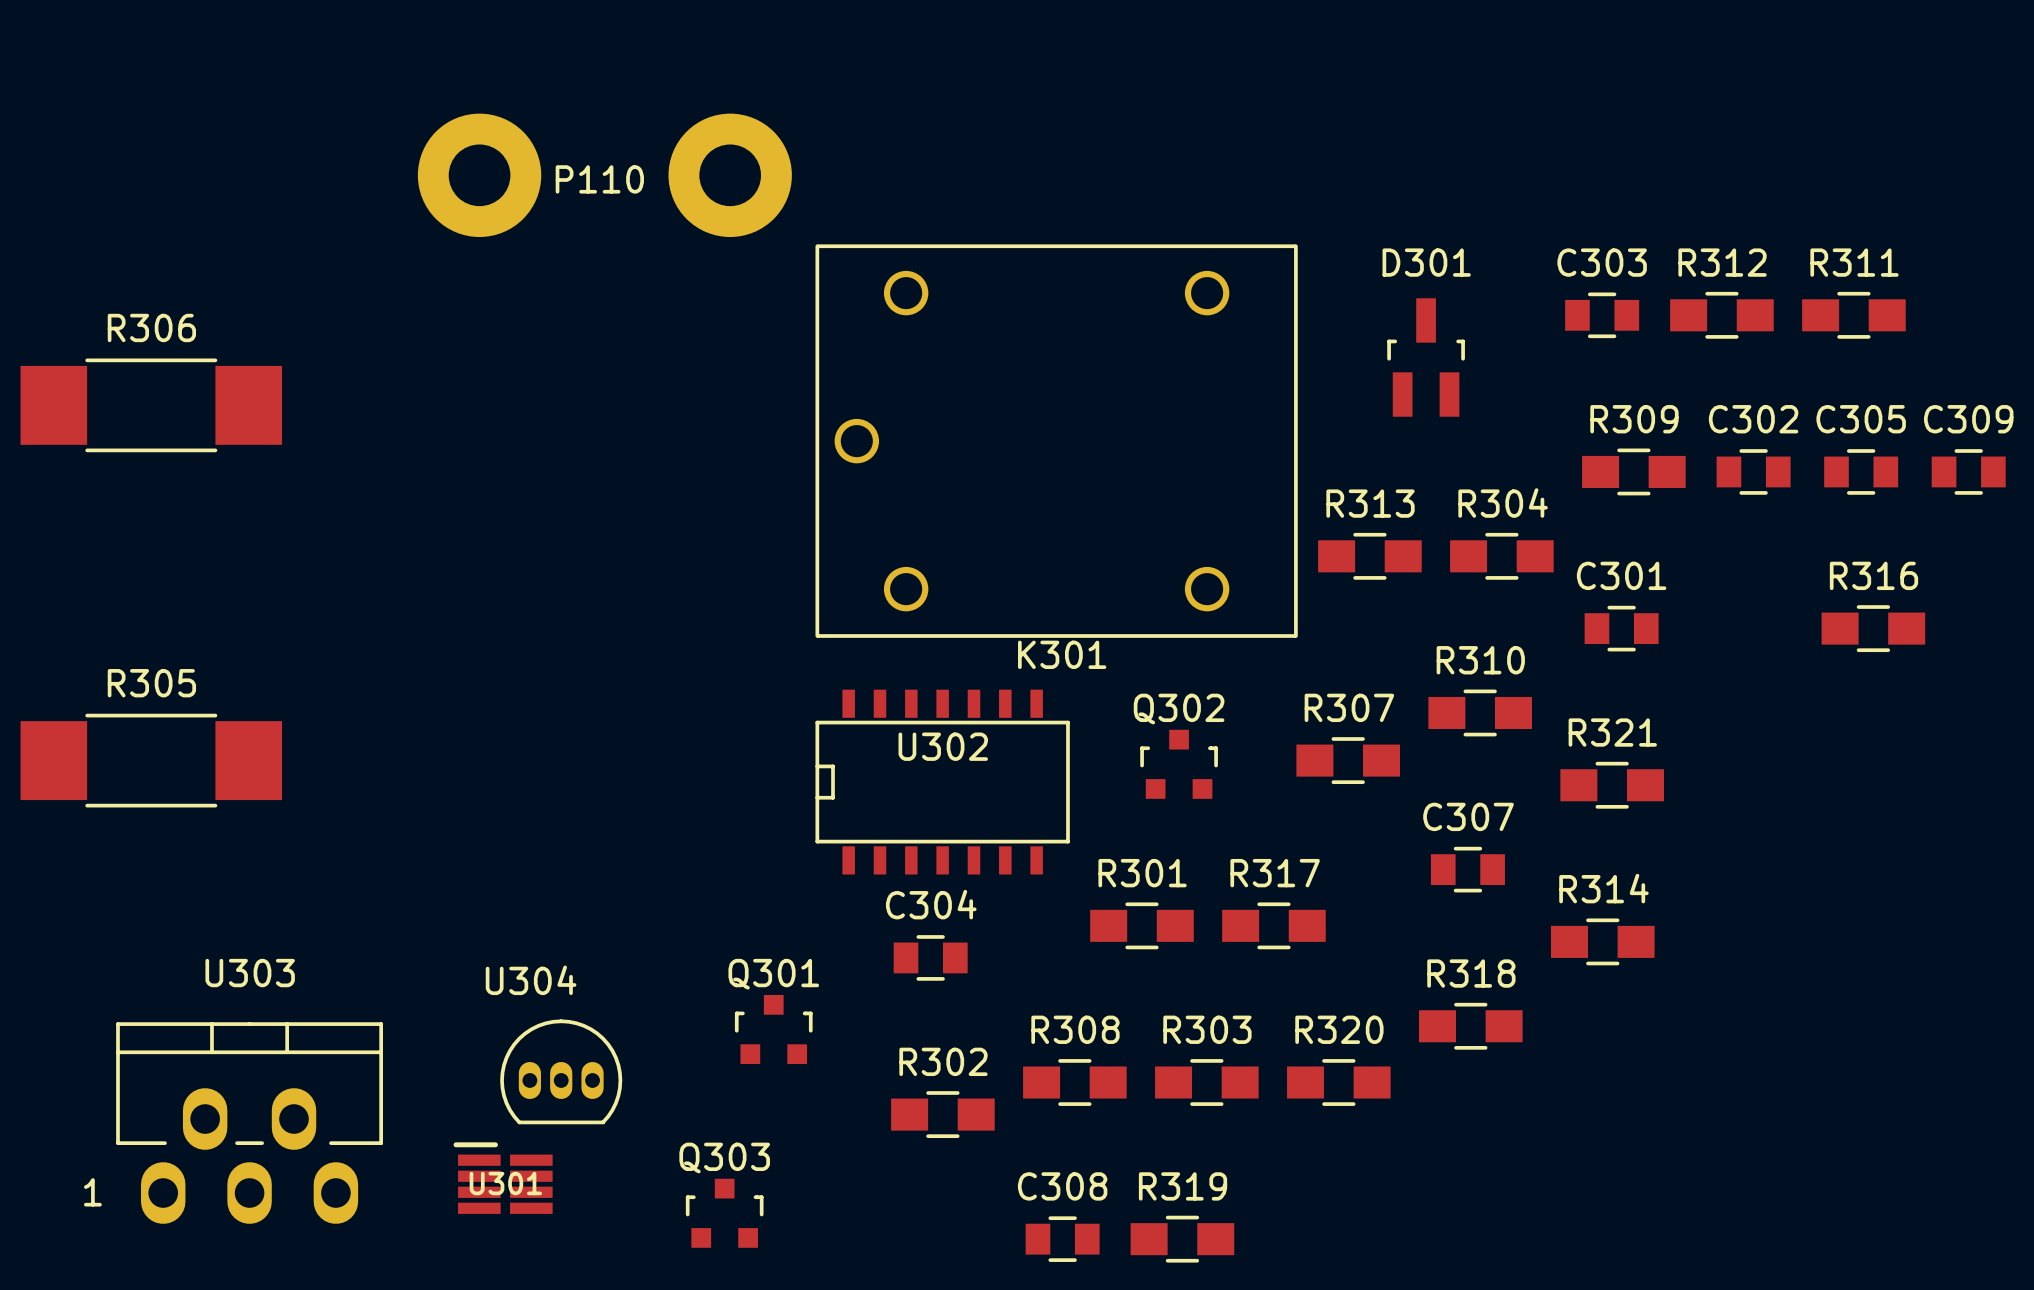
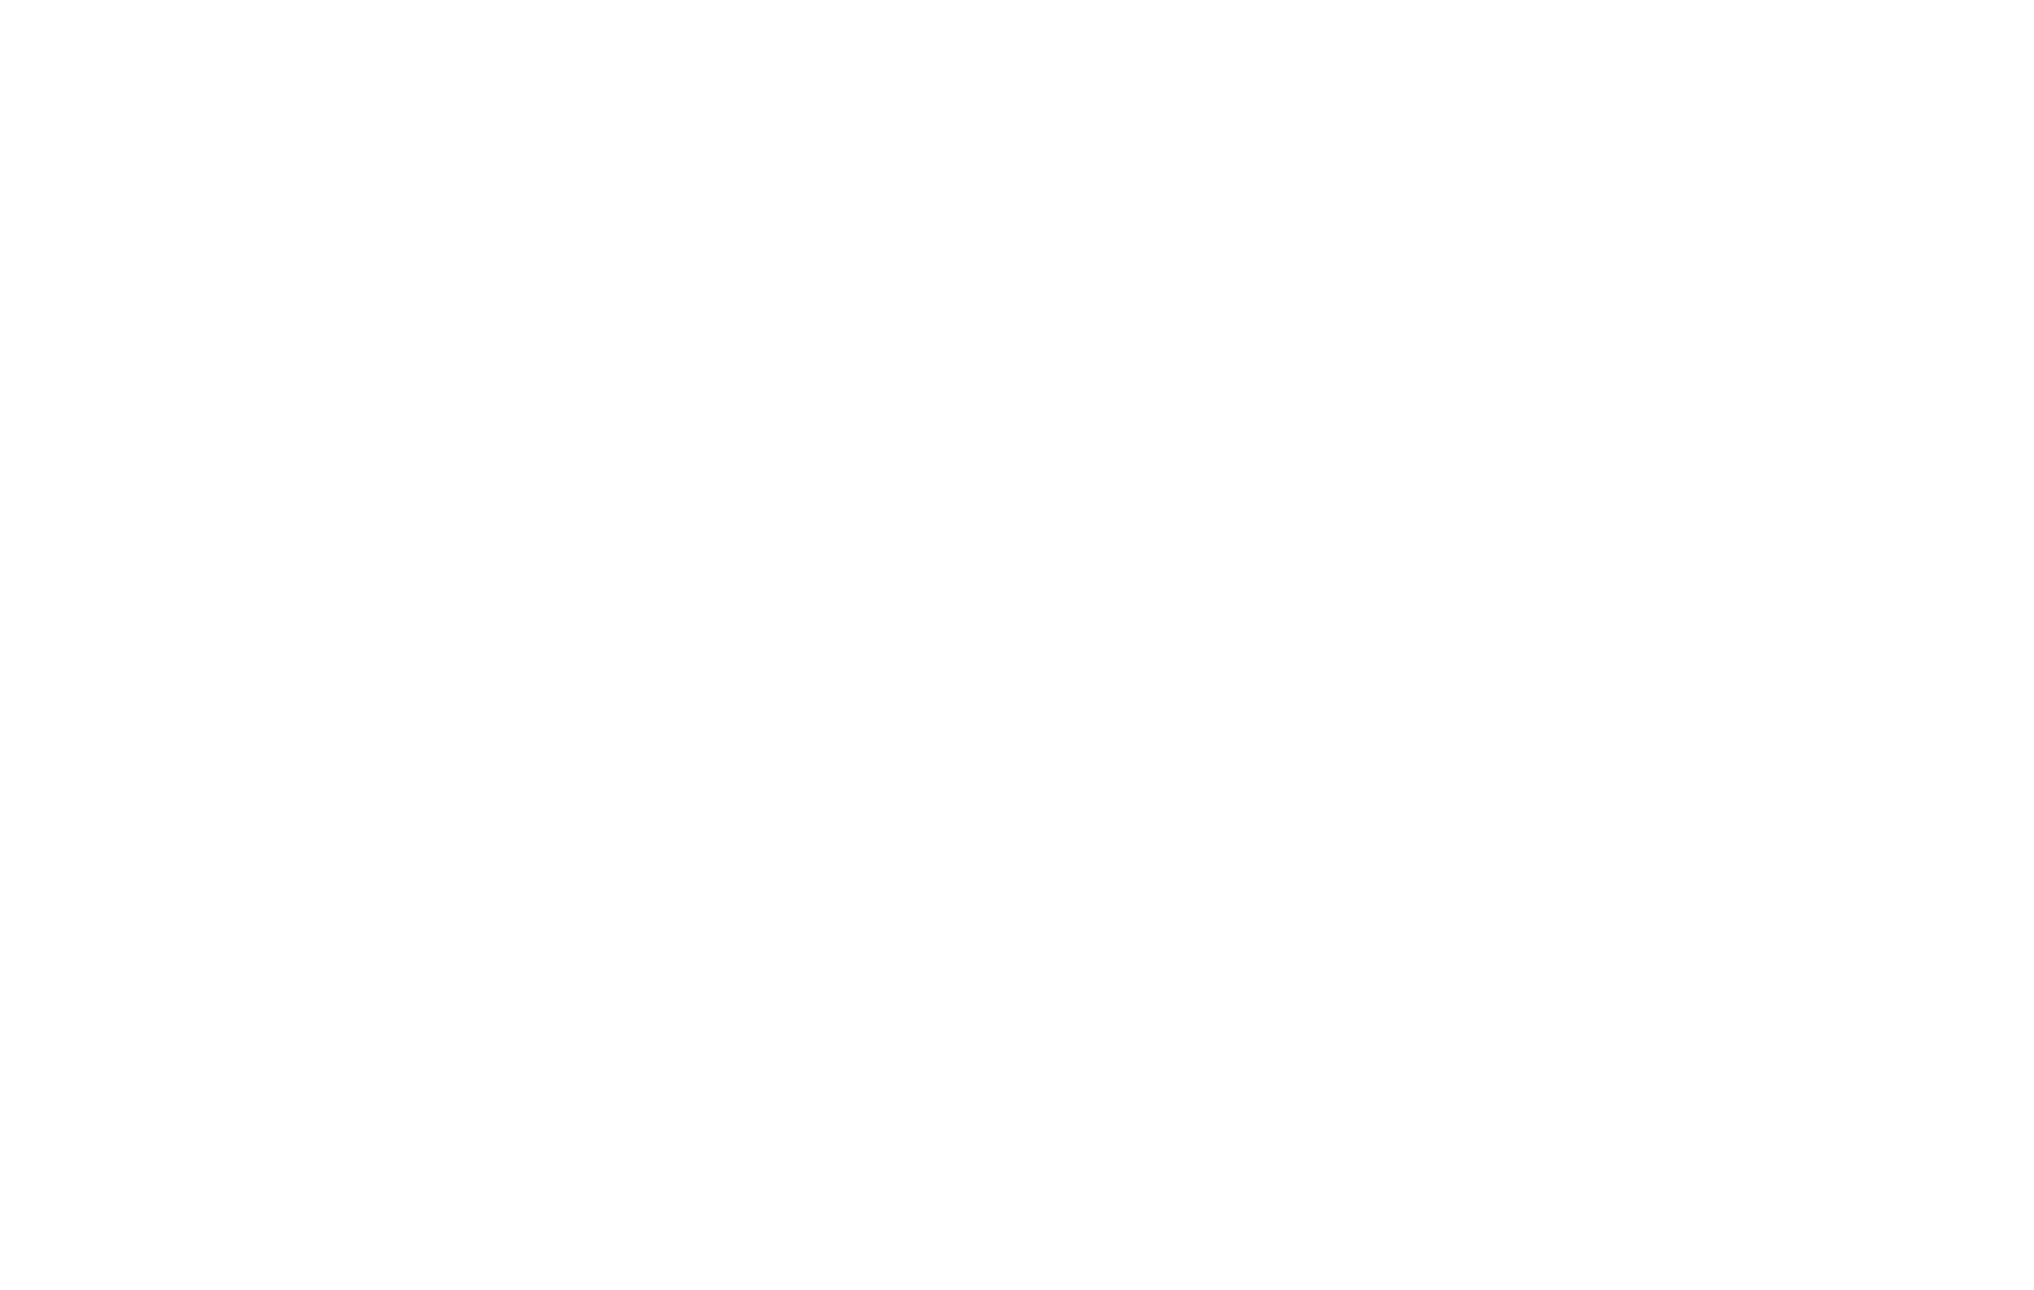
P110: (604, 175) -> none
C303: (1602, 315) -> none
R312: (1721, 315) -> none
R311: (1853, 315) -> none
D301: (1426, 357) -> none
R306: (151, 405) -> none
K301: (1056, 441) -> none
R309: (1633, 471) -> none
C302: (1753, 471) -> none
C305: (1861, 471) -> none
C309: (1968, 471) -> none
R313: (1369, 556) -> none
R304: (1501, 556) -> none
C301: (1621, 628) -> none
R316: (1873, 628) -> none
R310: (1480, 712) -> none
R305: (151, 760) -> none
R307: (1348, 760) -> none
Q302: (1179, 764) -> none
U302: (942, 782) -> none
R321: (1612, 785) -> none
C307: (1467, 869) -> none
R301: (1141, 925) -> none
R317: (1273, 925) -> none
R314: (1602, 941) -> none
C304: (930, 957) -> none
R318: (1470, 1026) -> none
Q301: (773, 1029) -> none
U304: (561, 1071) -> none
R308: (1074, 1082) -> none
R303: (1206, 1082) -> none
R320: (1338, 1082) -> none
R302: (942, 1114) -> none
U303: (249, 1123) -> none
U301: (503, 1178) -> none
Q303: (724, 1213) -> none
C308: (1062, 1239) -> none
R319: (1182, 1239) -> none

